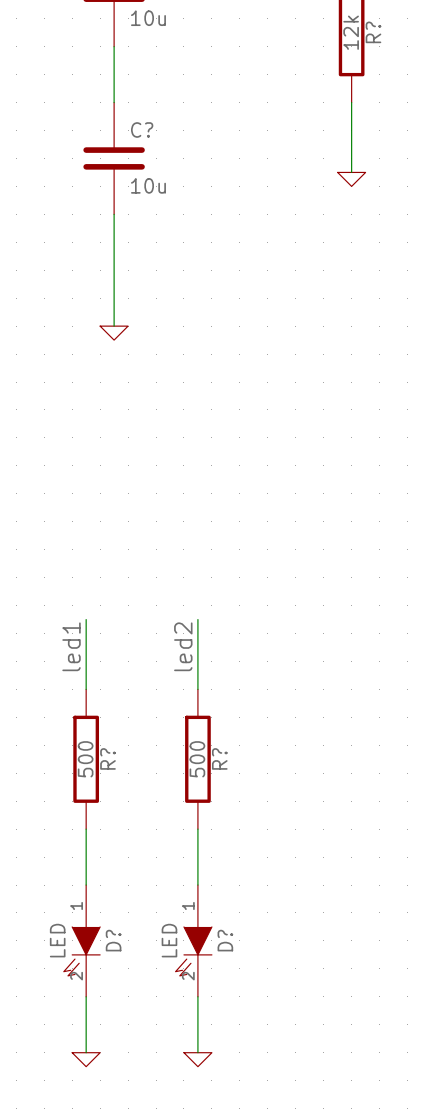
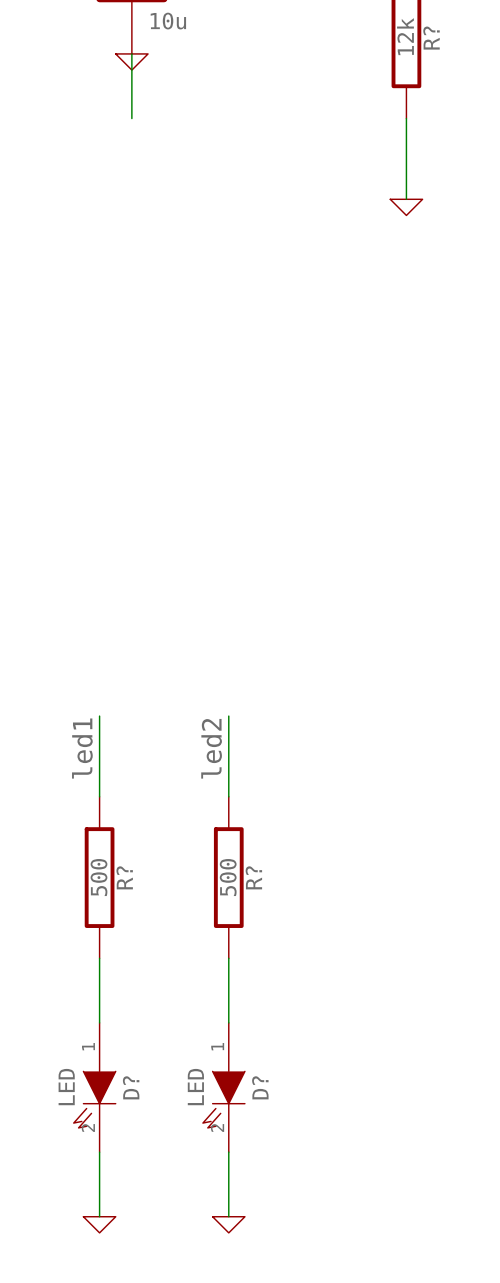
power symbol: none -> (131, 62)
C?: 10u (114, 158) -> none
wire: (114, 214) (114, 326) -> none
power symbol: (114, 333) -> none

